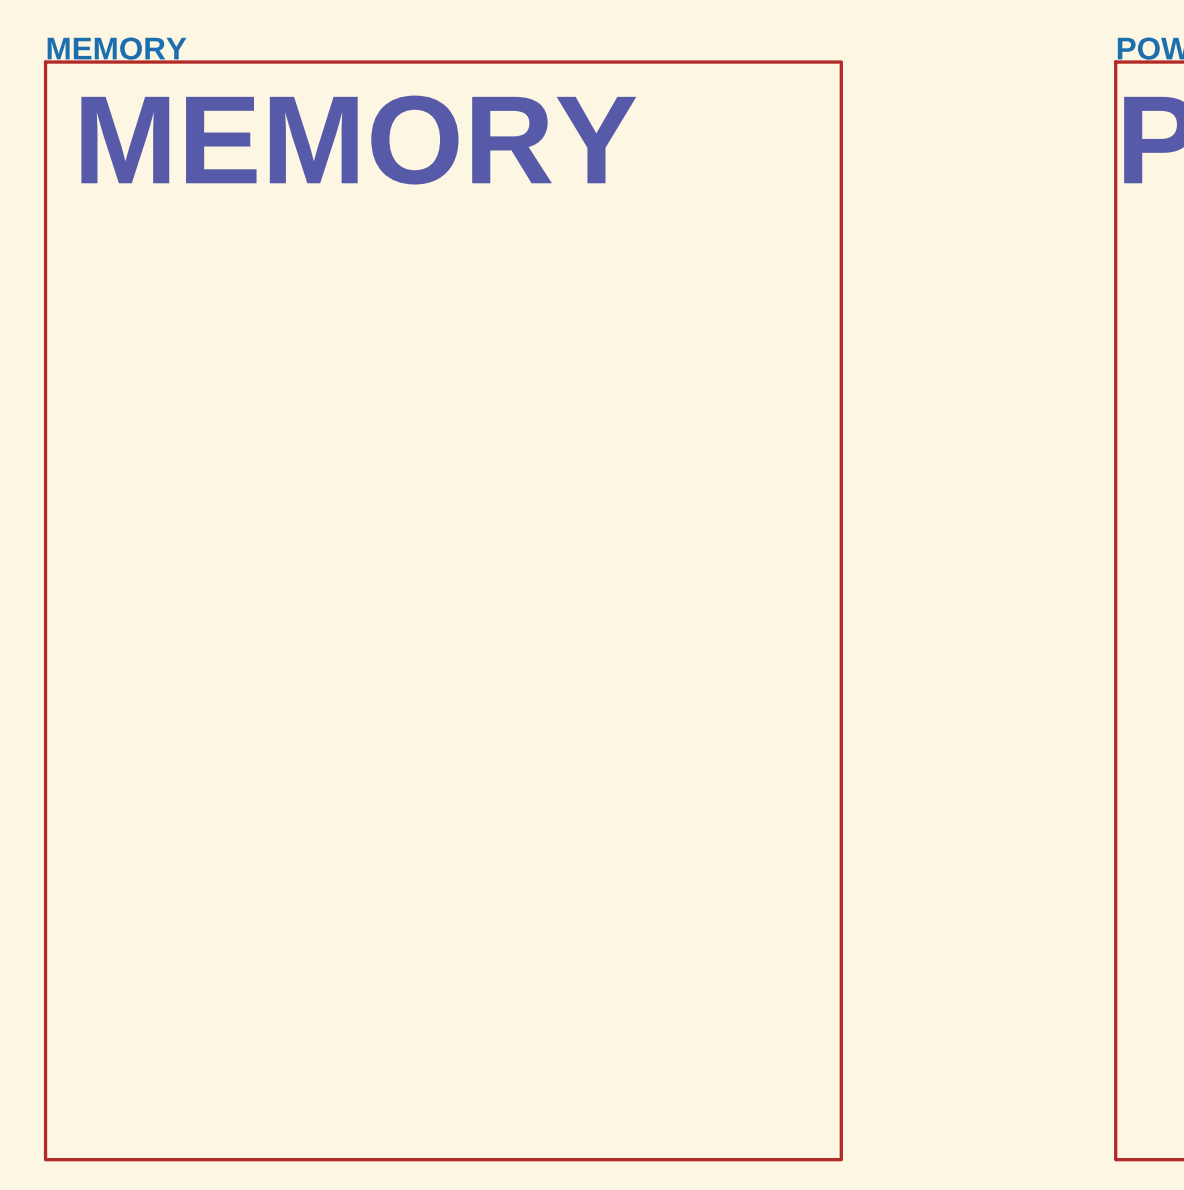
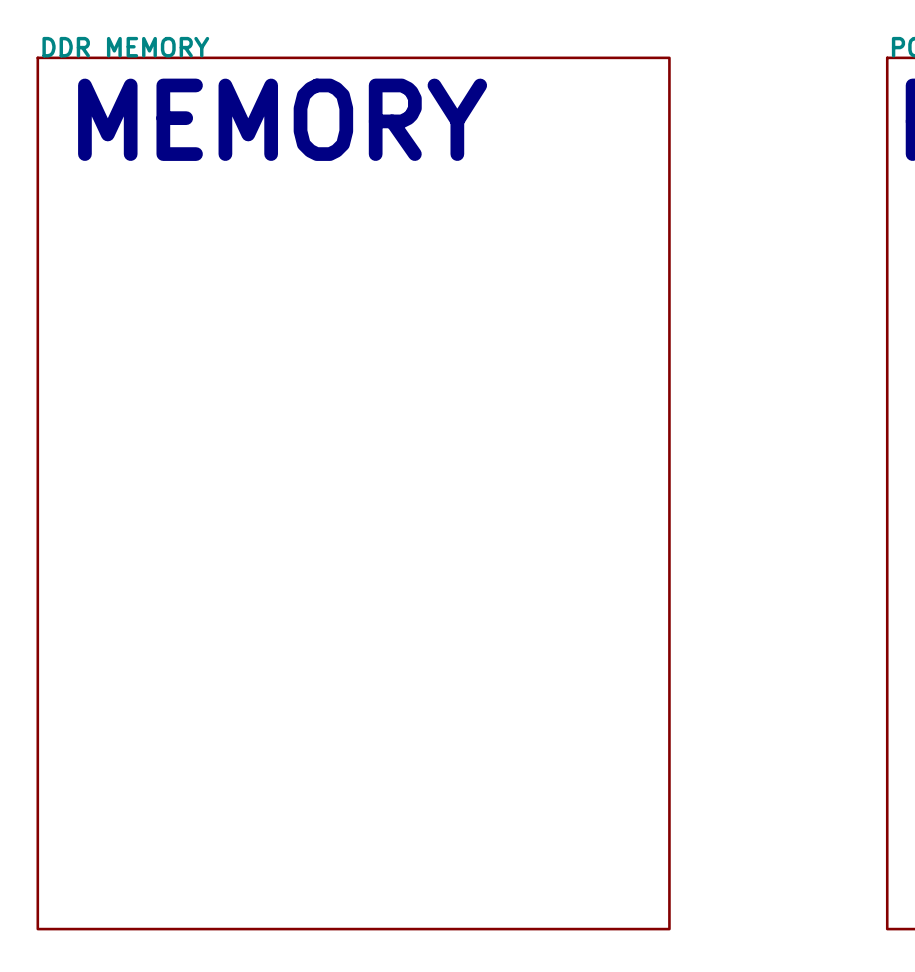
sheet MEMORY name: MEMORY (117, 48) -> DDR MEMORY (125, 47)

